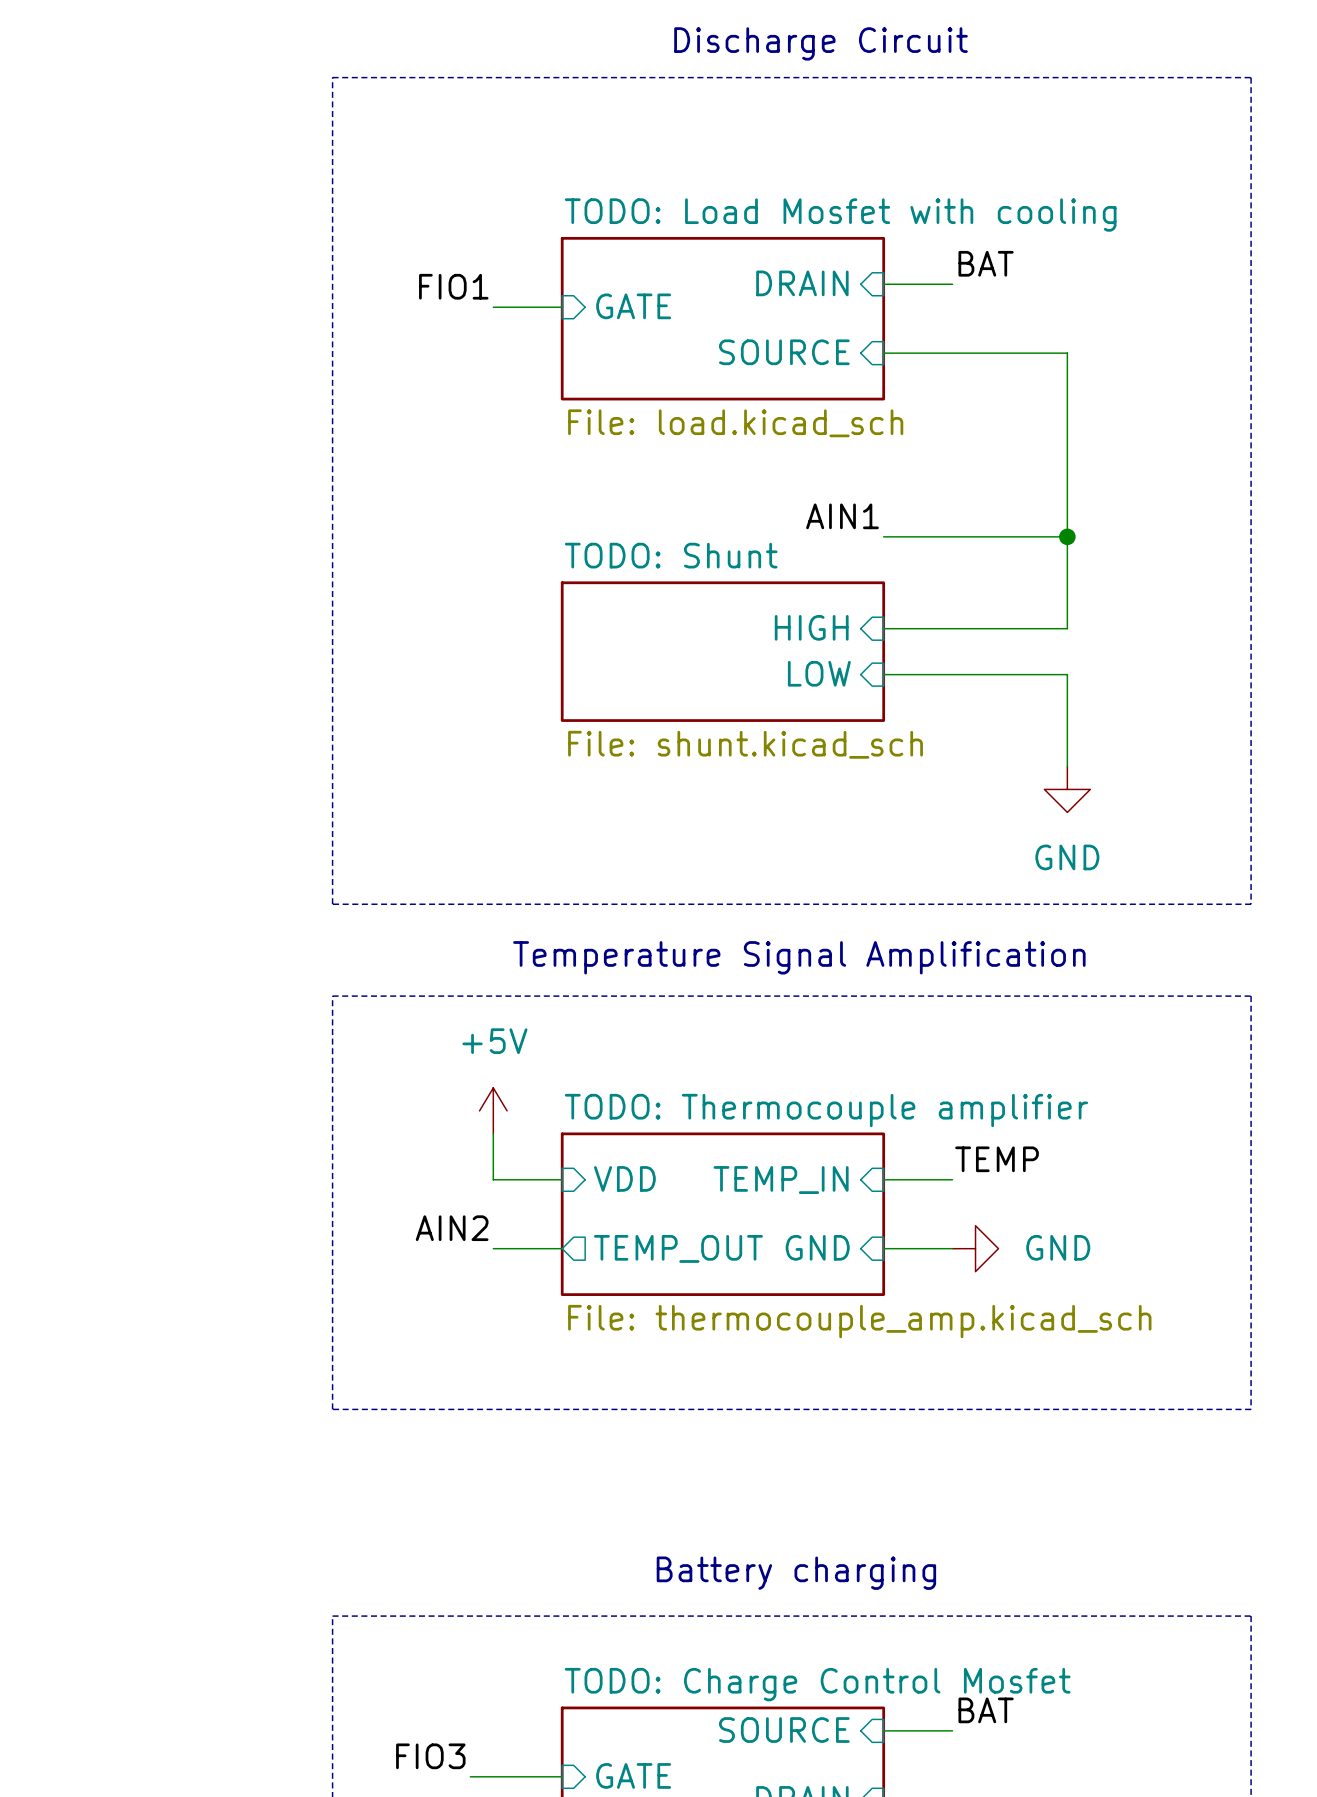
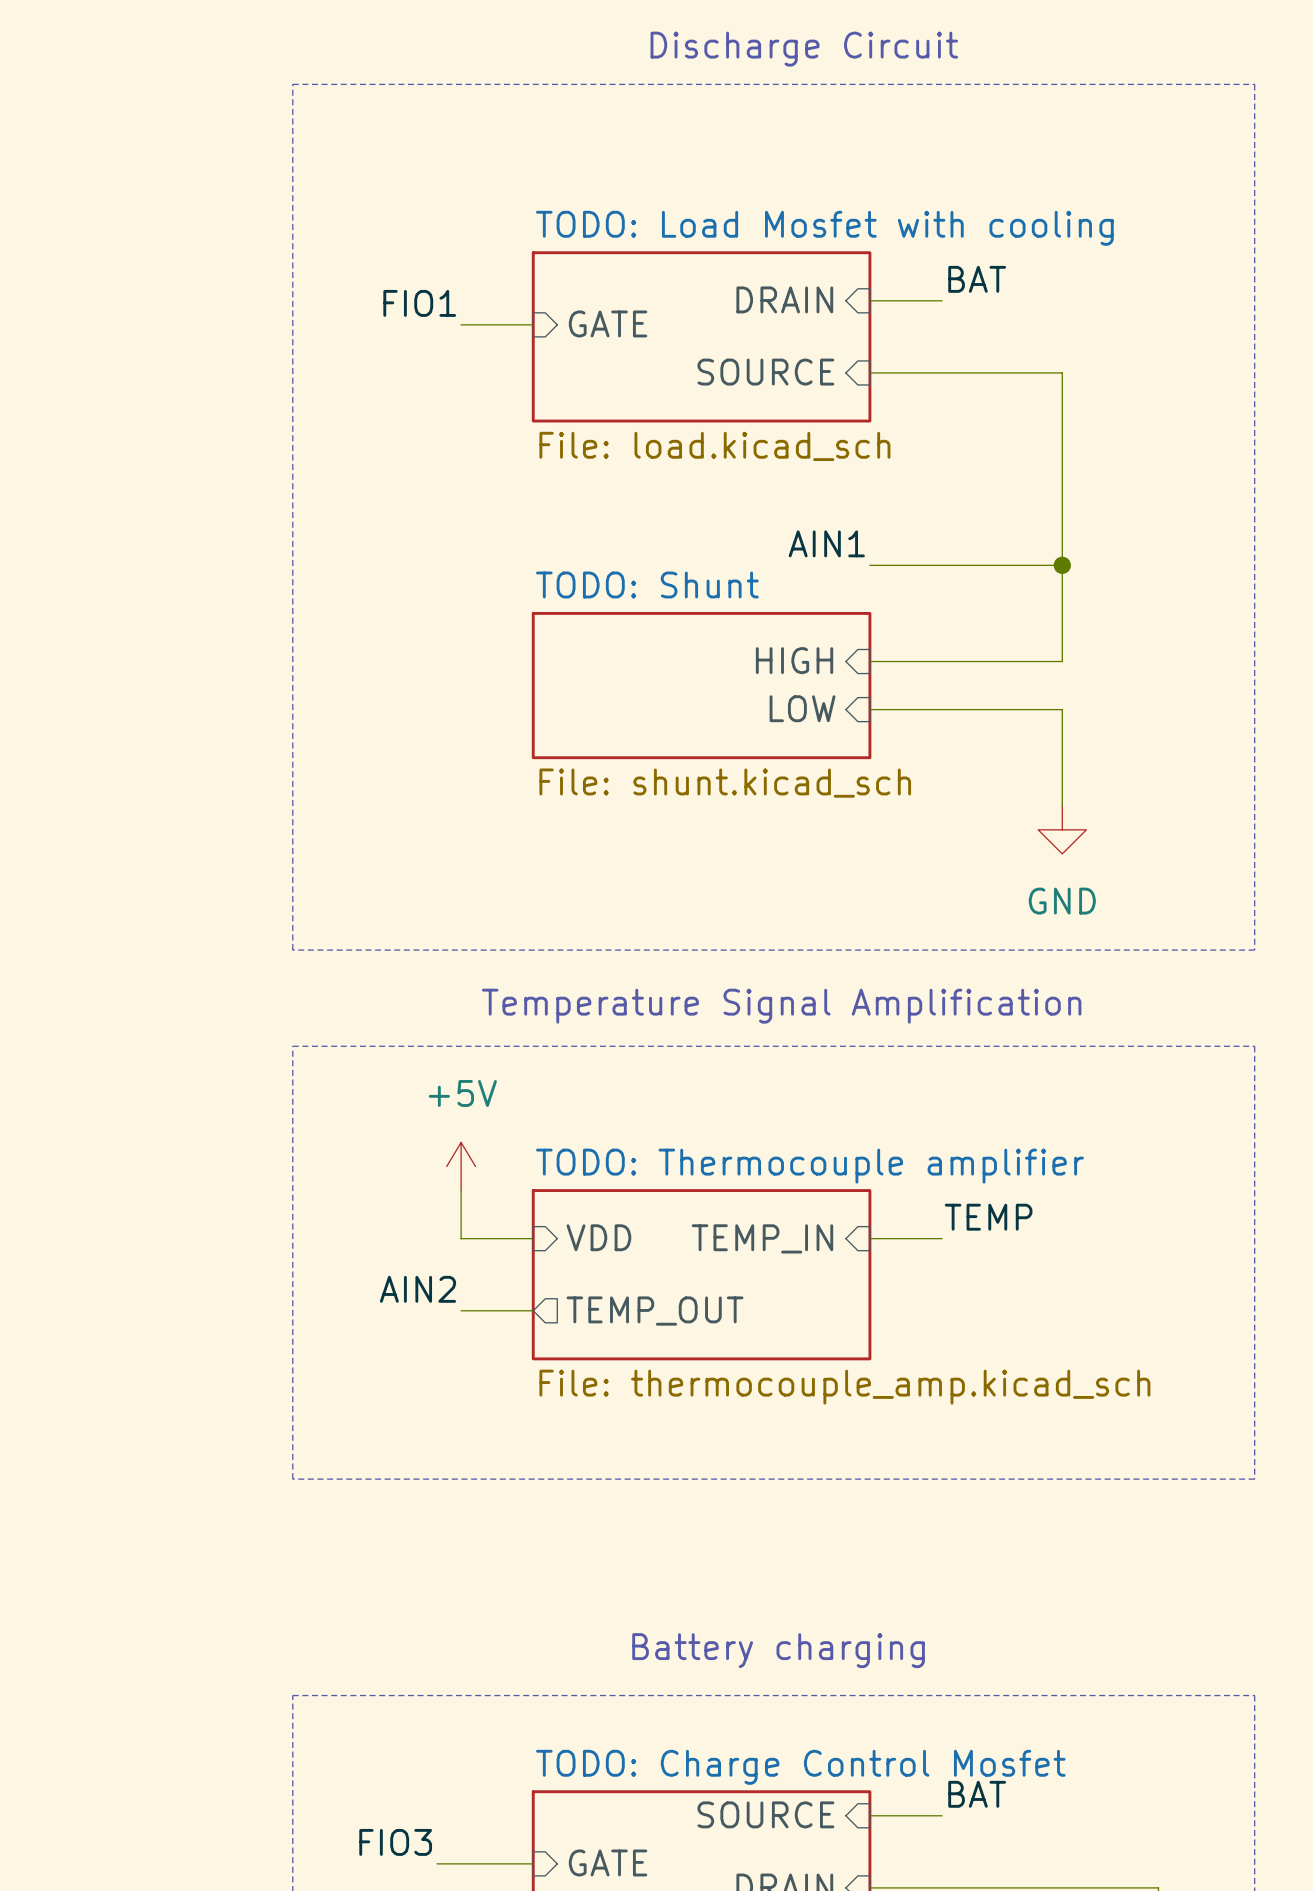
sheet pin: GND (817, 1247) -> none
wire: (883, 1248) (952, 1248) -> none
power symbol: GND (975, 1248) -> none

